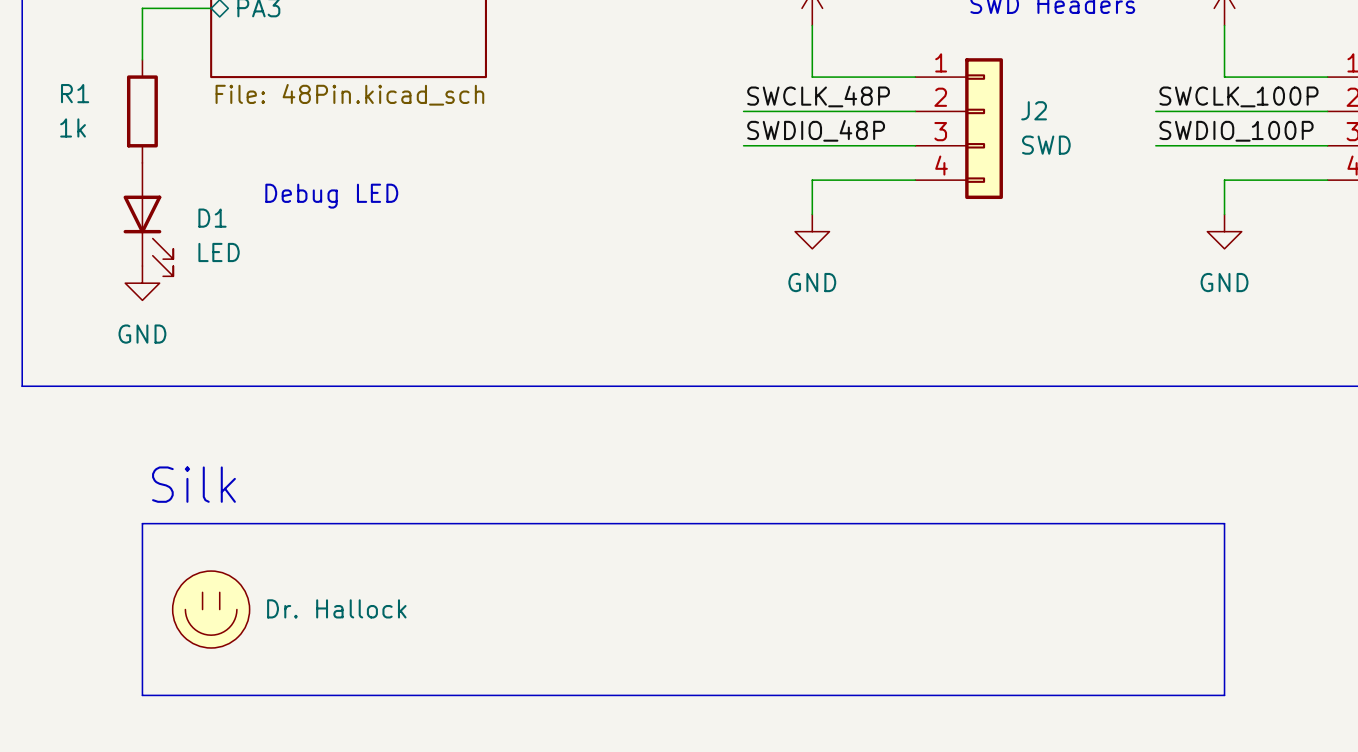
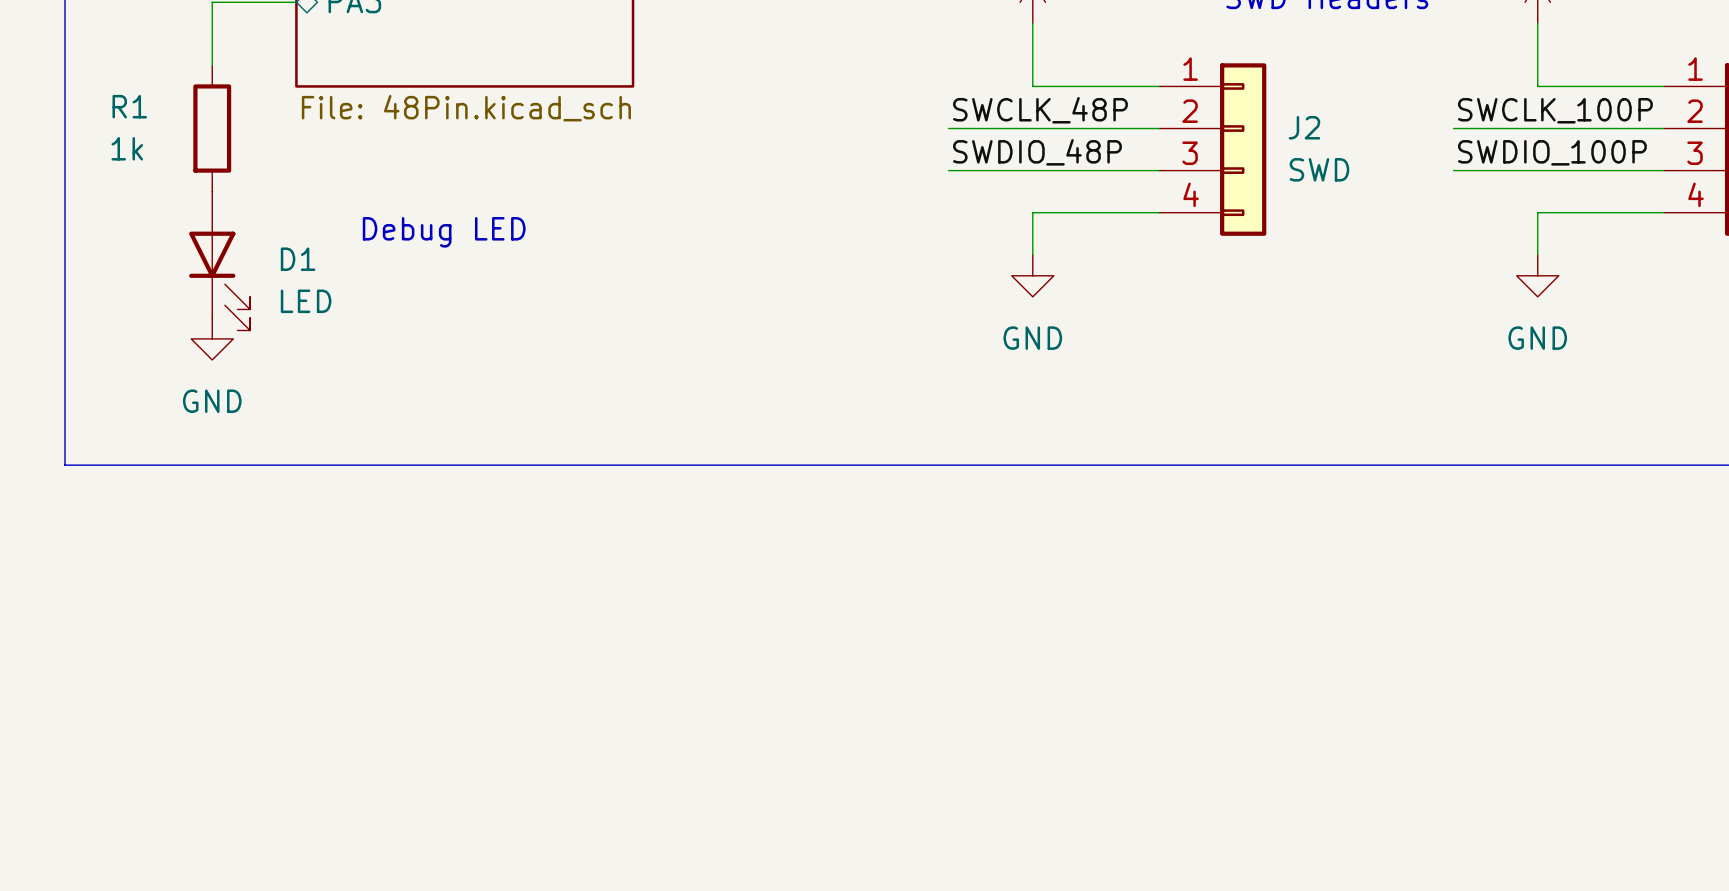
text: Silk (193, 484) -> none
line: (142, 523) (1224, 523) (1224, 695) (142, 695) (142, 523) -> none
part: Dr. Hallock (211, 609) -> none

